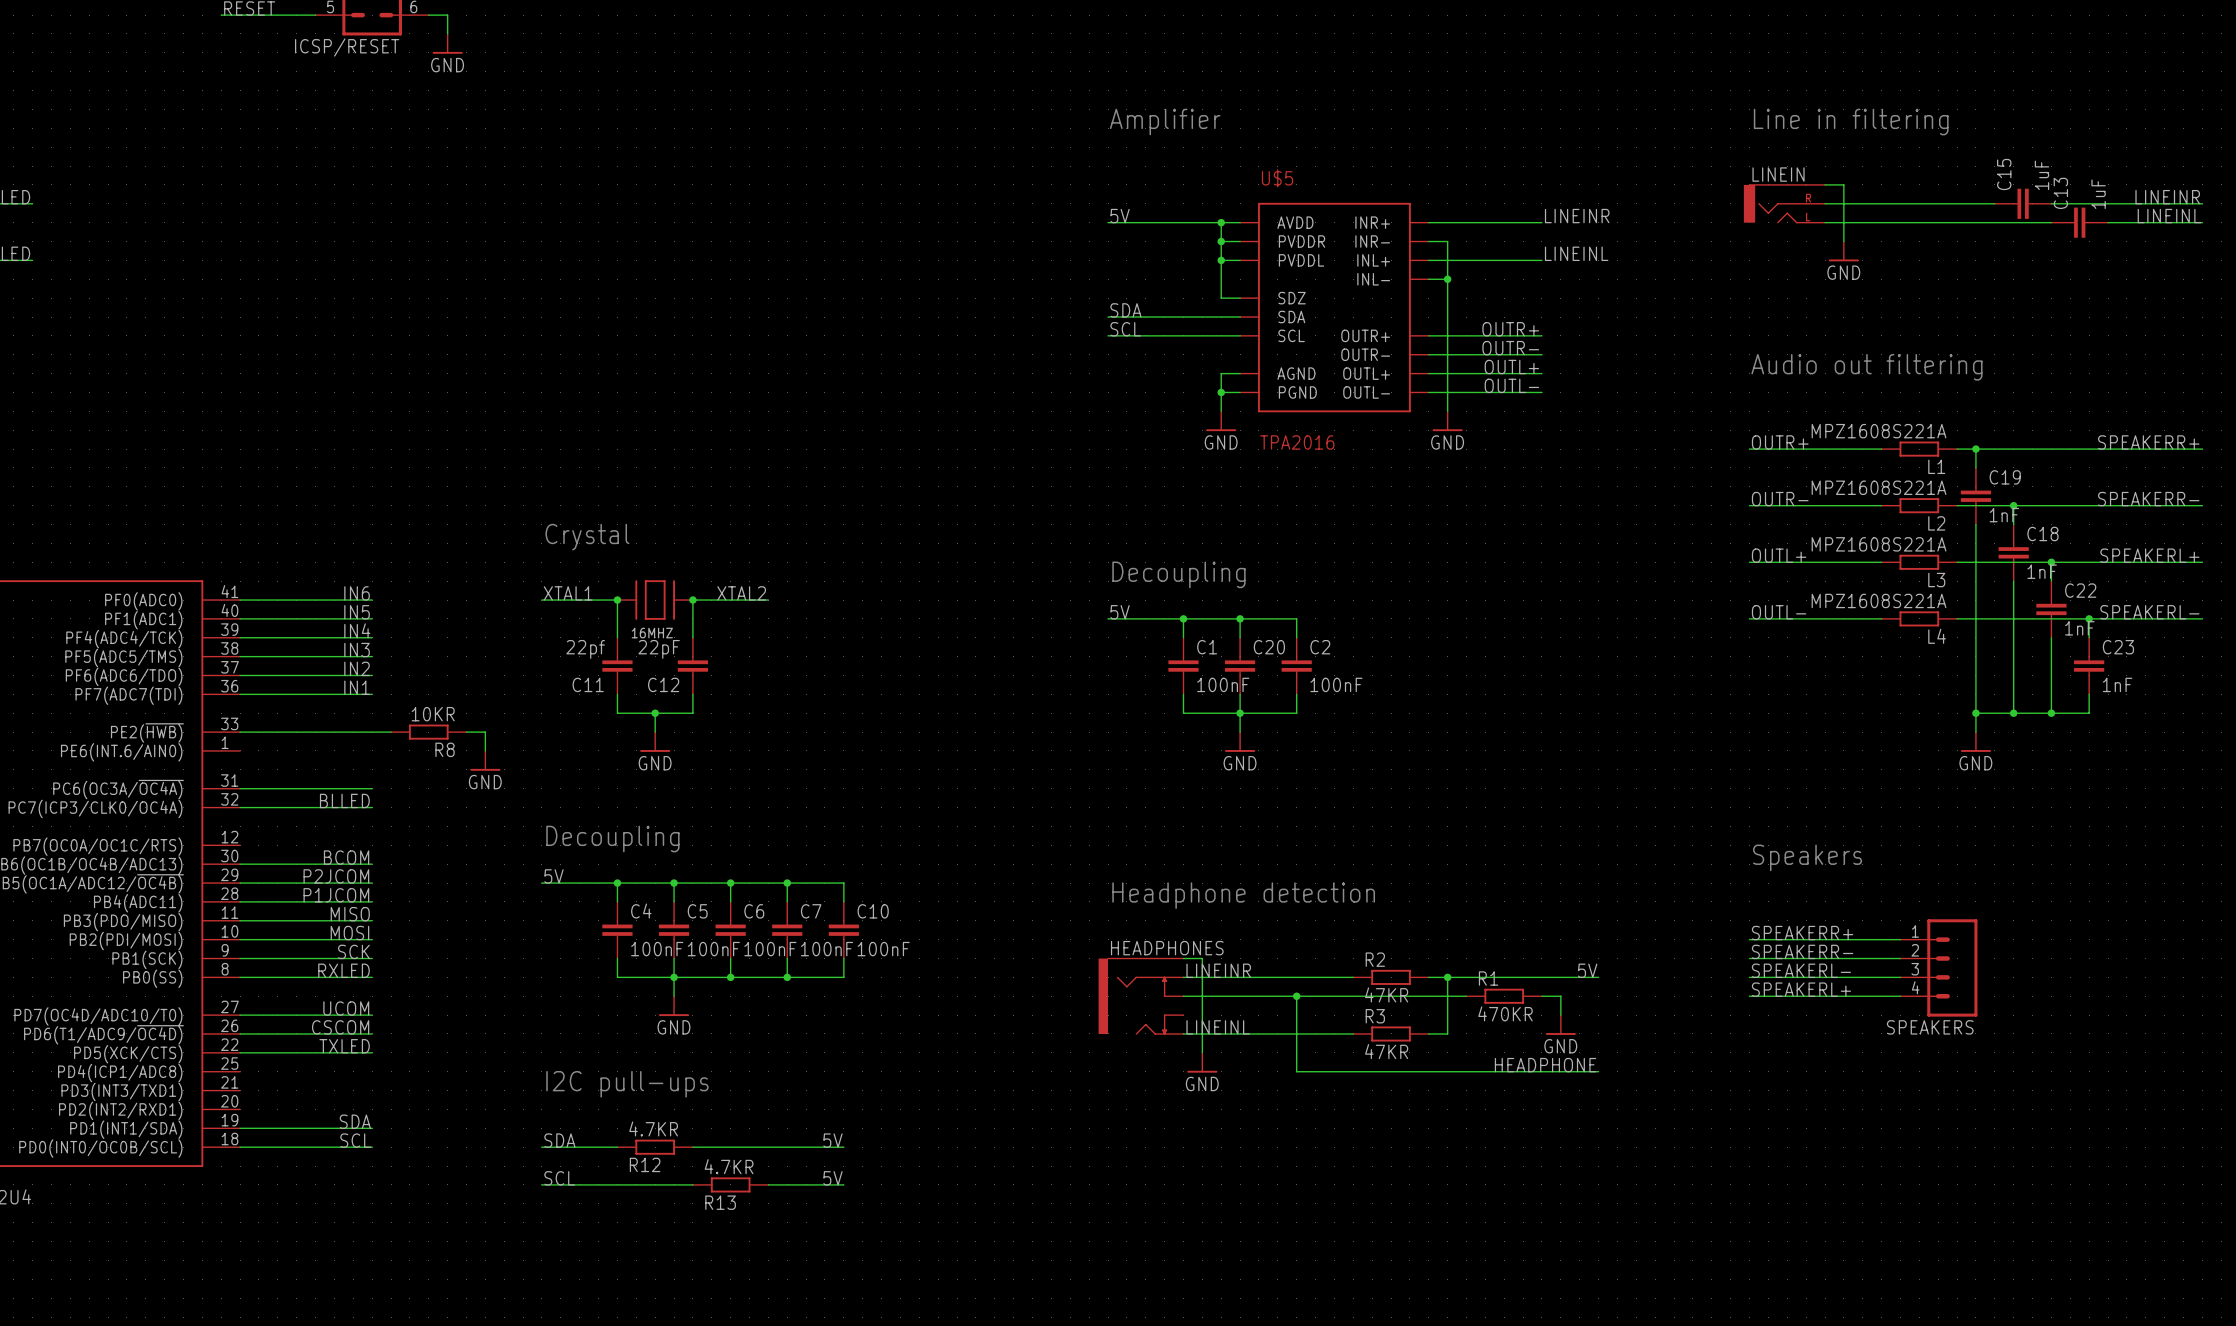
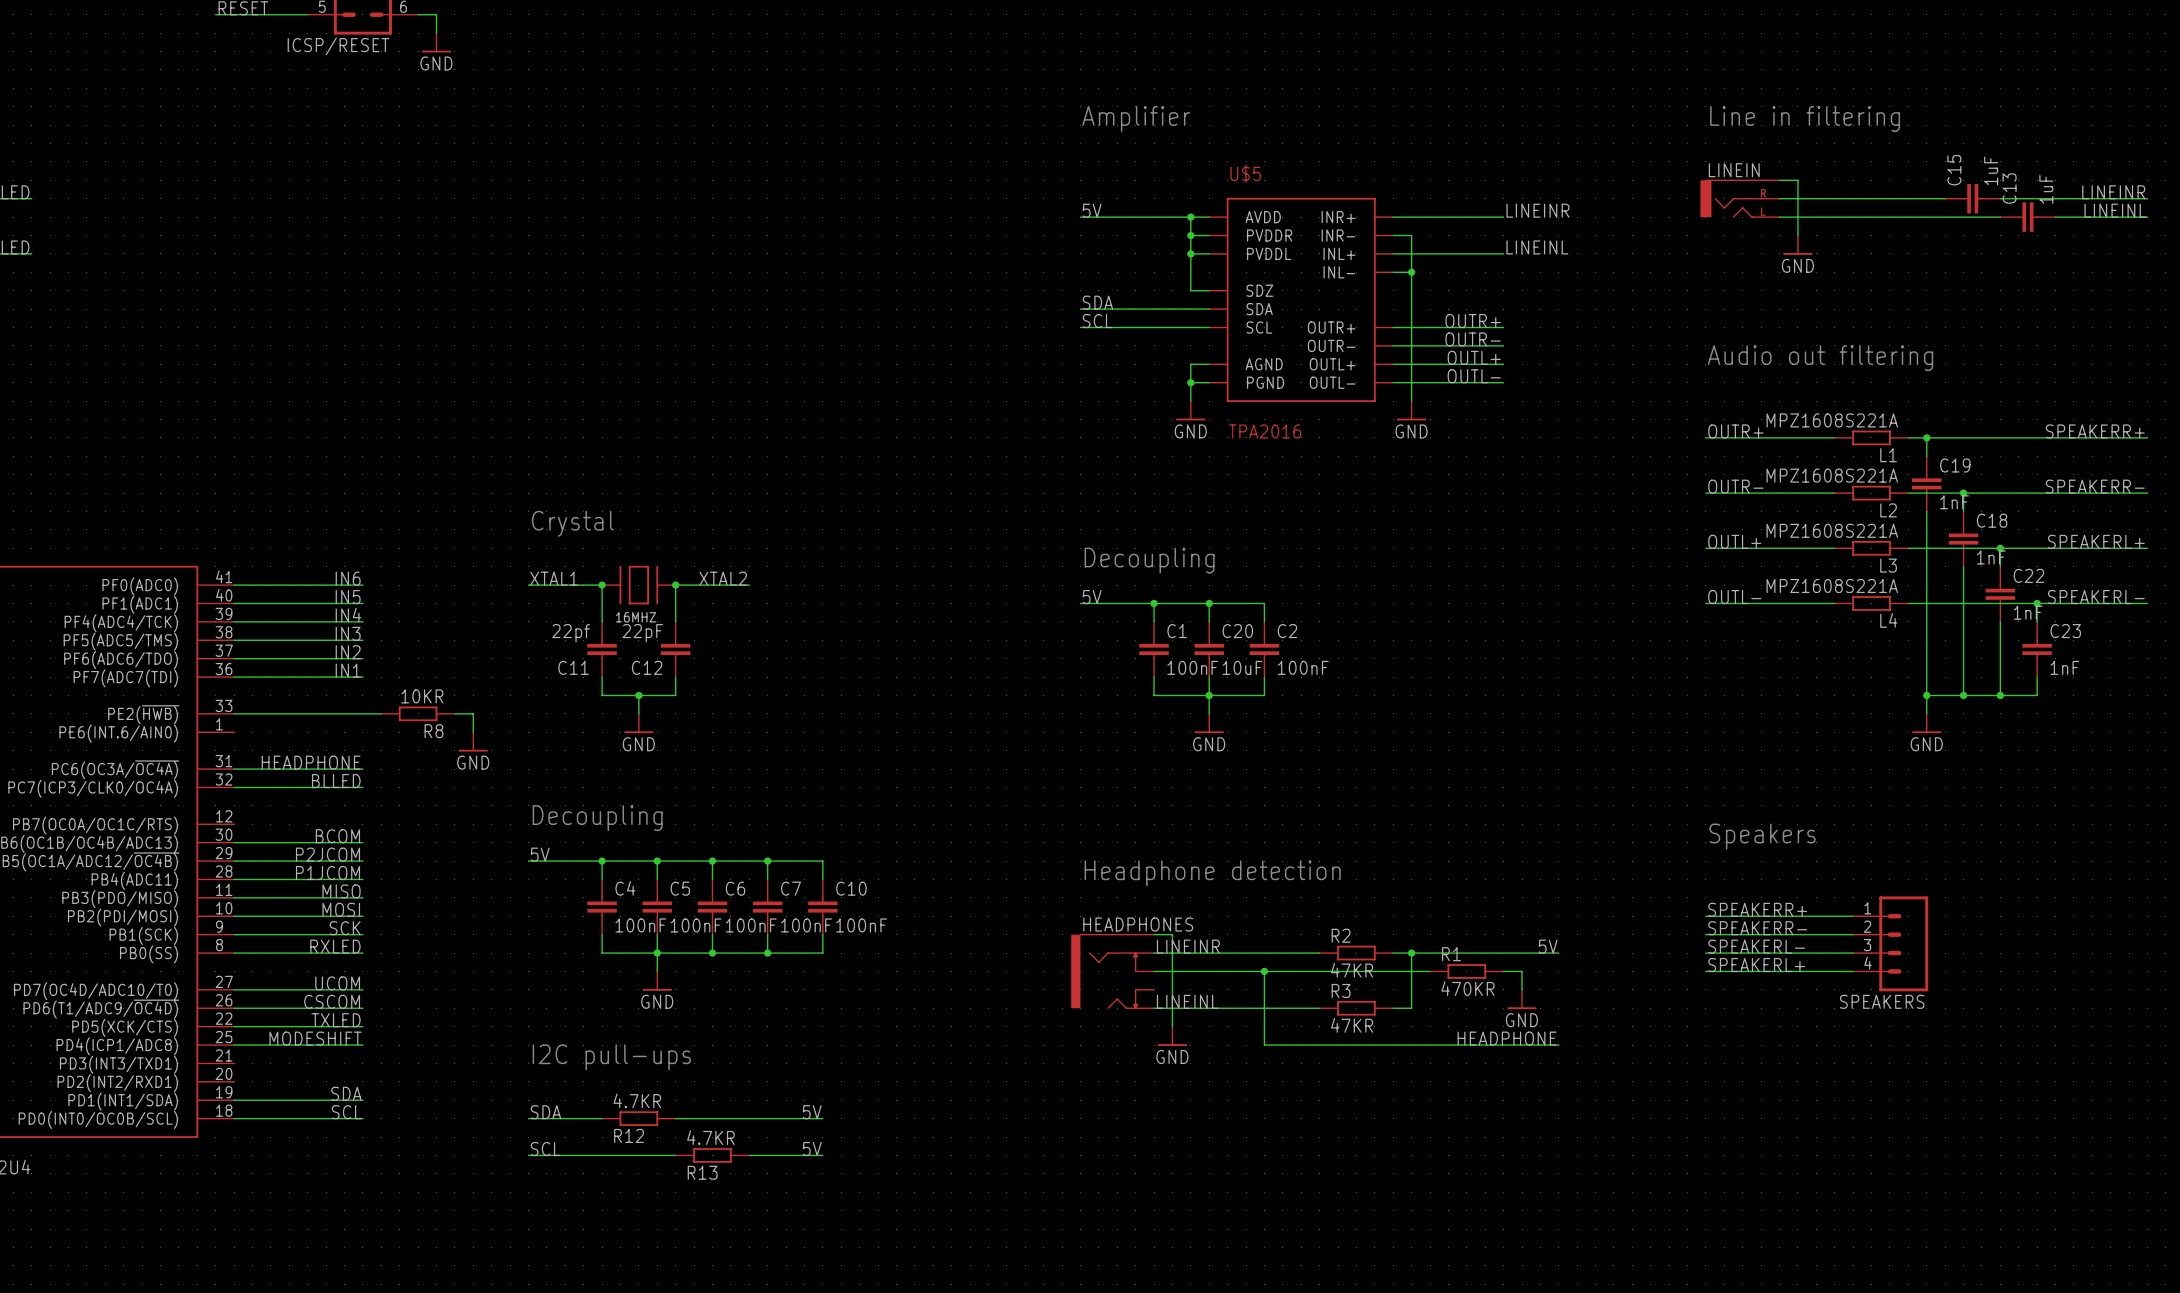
C20 value: none -> 10uF (1242, 667)
label: none -> HEADPHONE (311, 762)
label: none -> MODESHIFT (315, 1038)
wire: none -> (234, 1045) (362, 1045)

